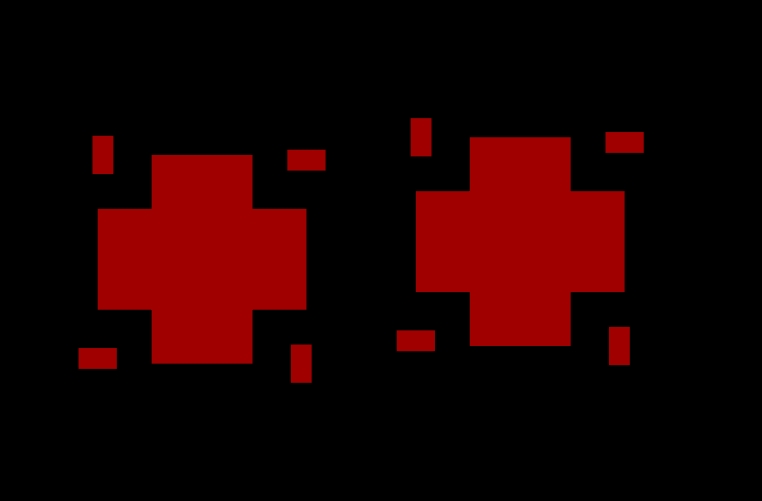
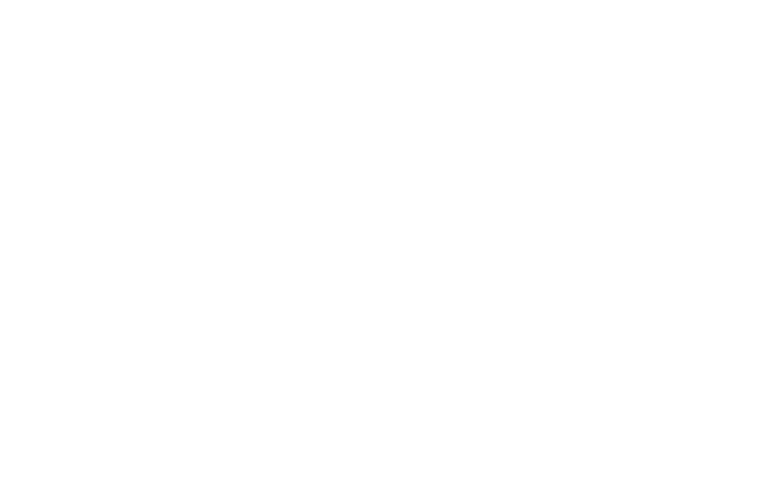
part: (520, 241) -> none
part: (202, 259) -> none

